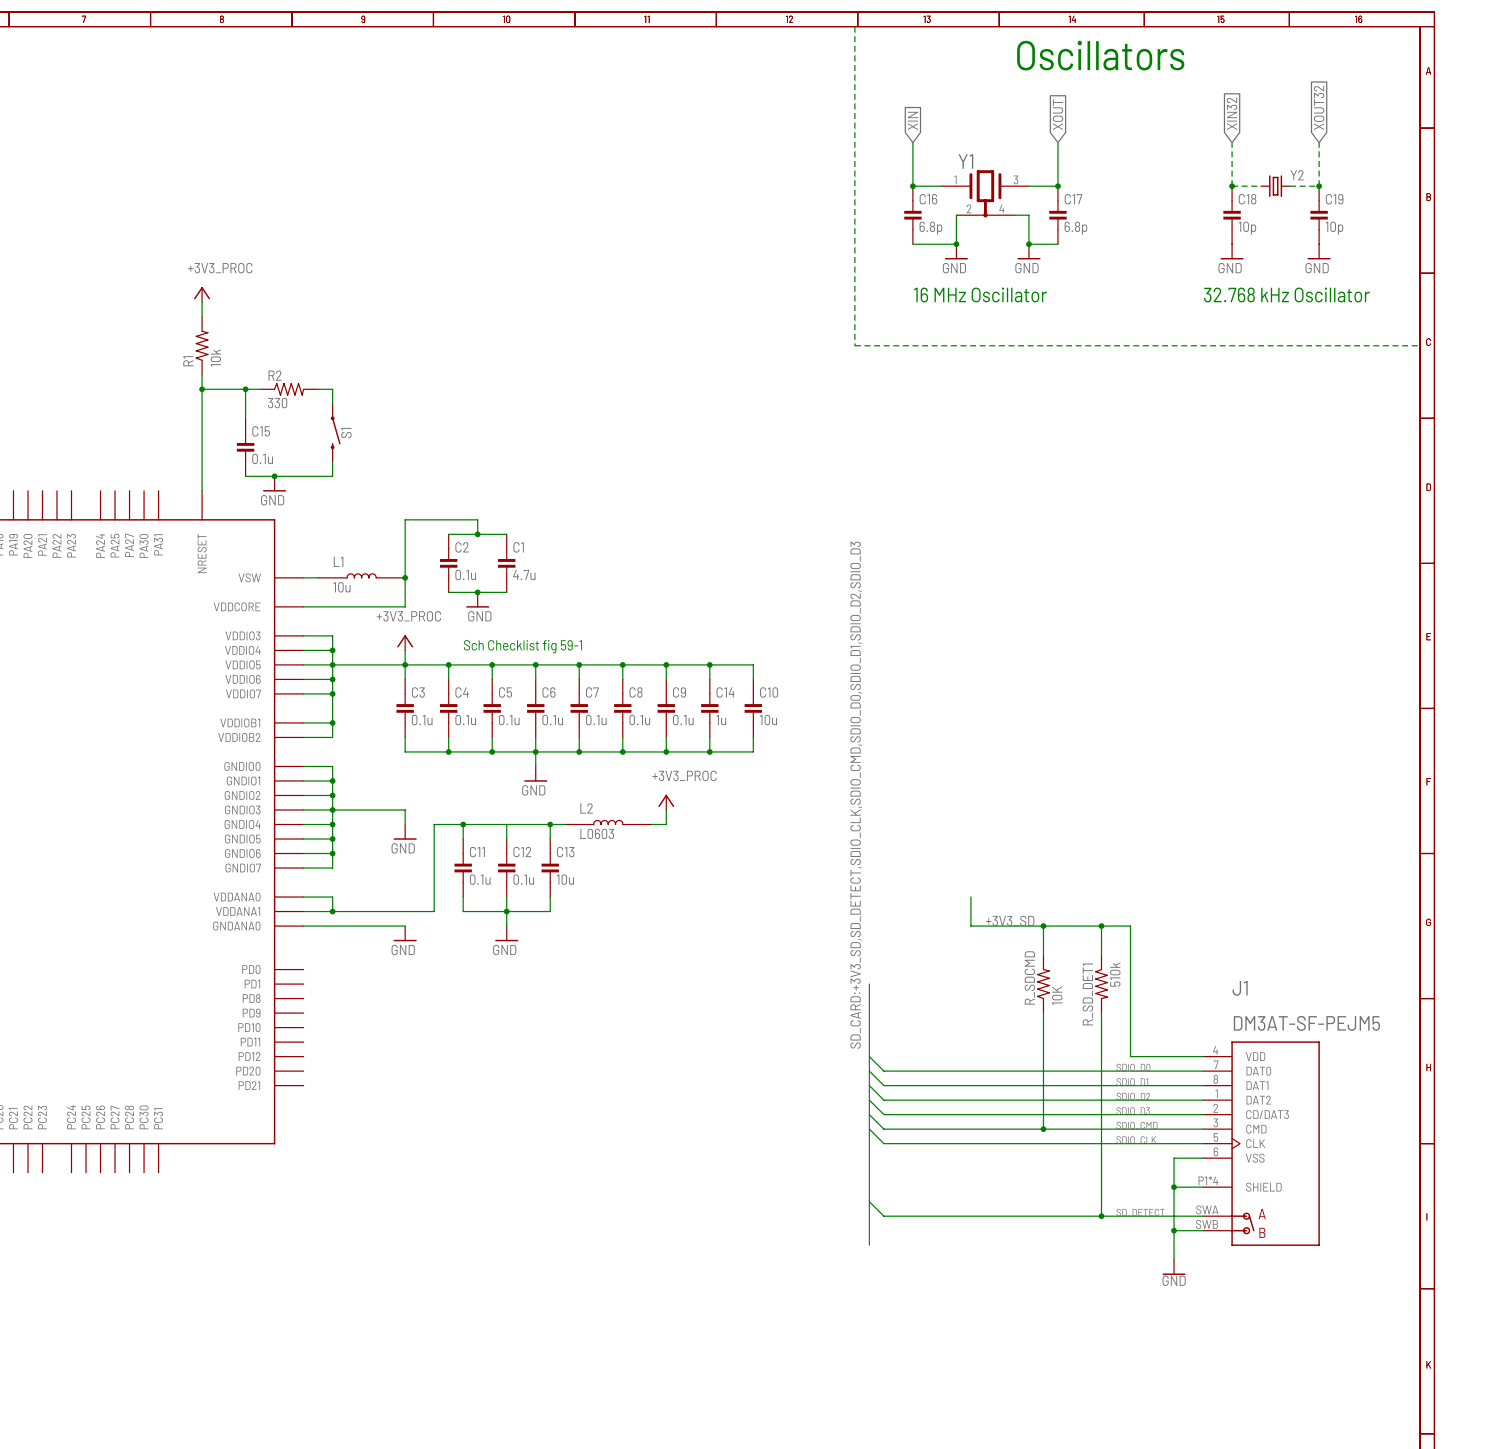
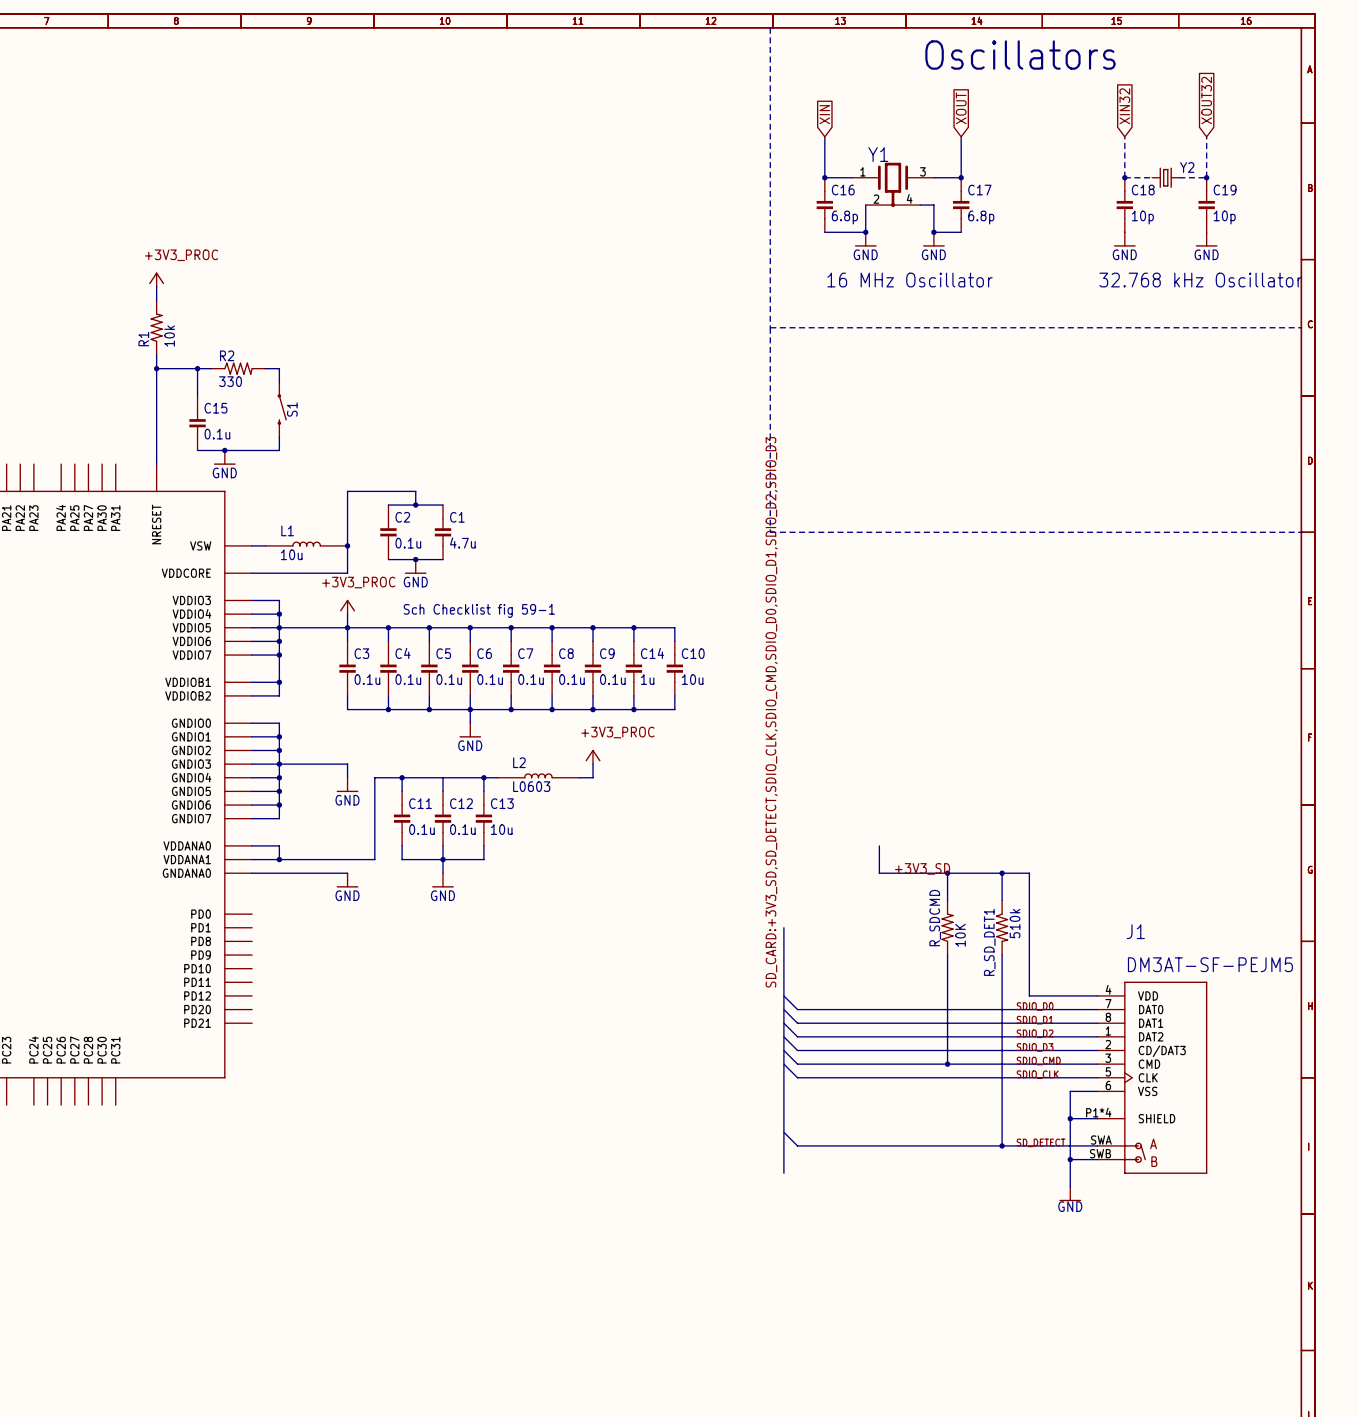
wire: none -> (770, 327) (770, 532) (1302, 532)

